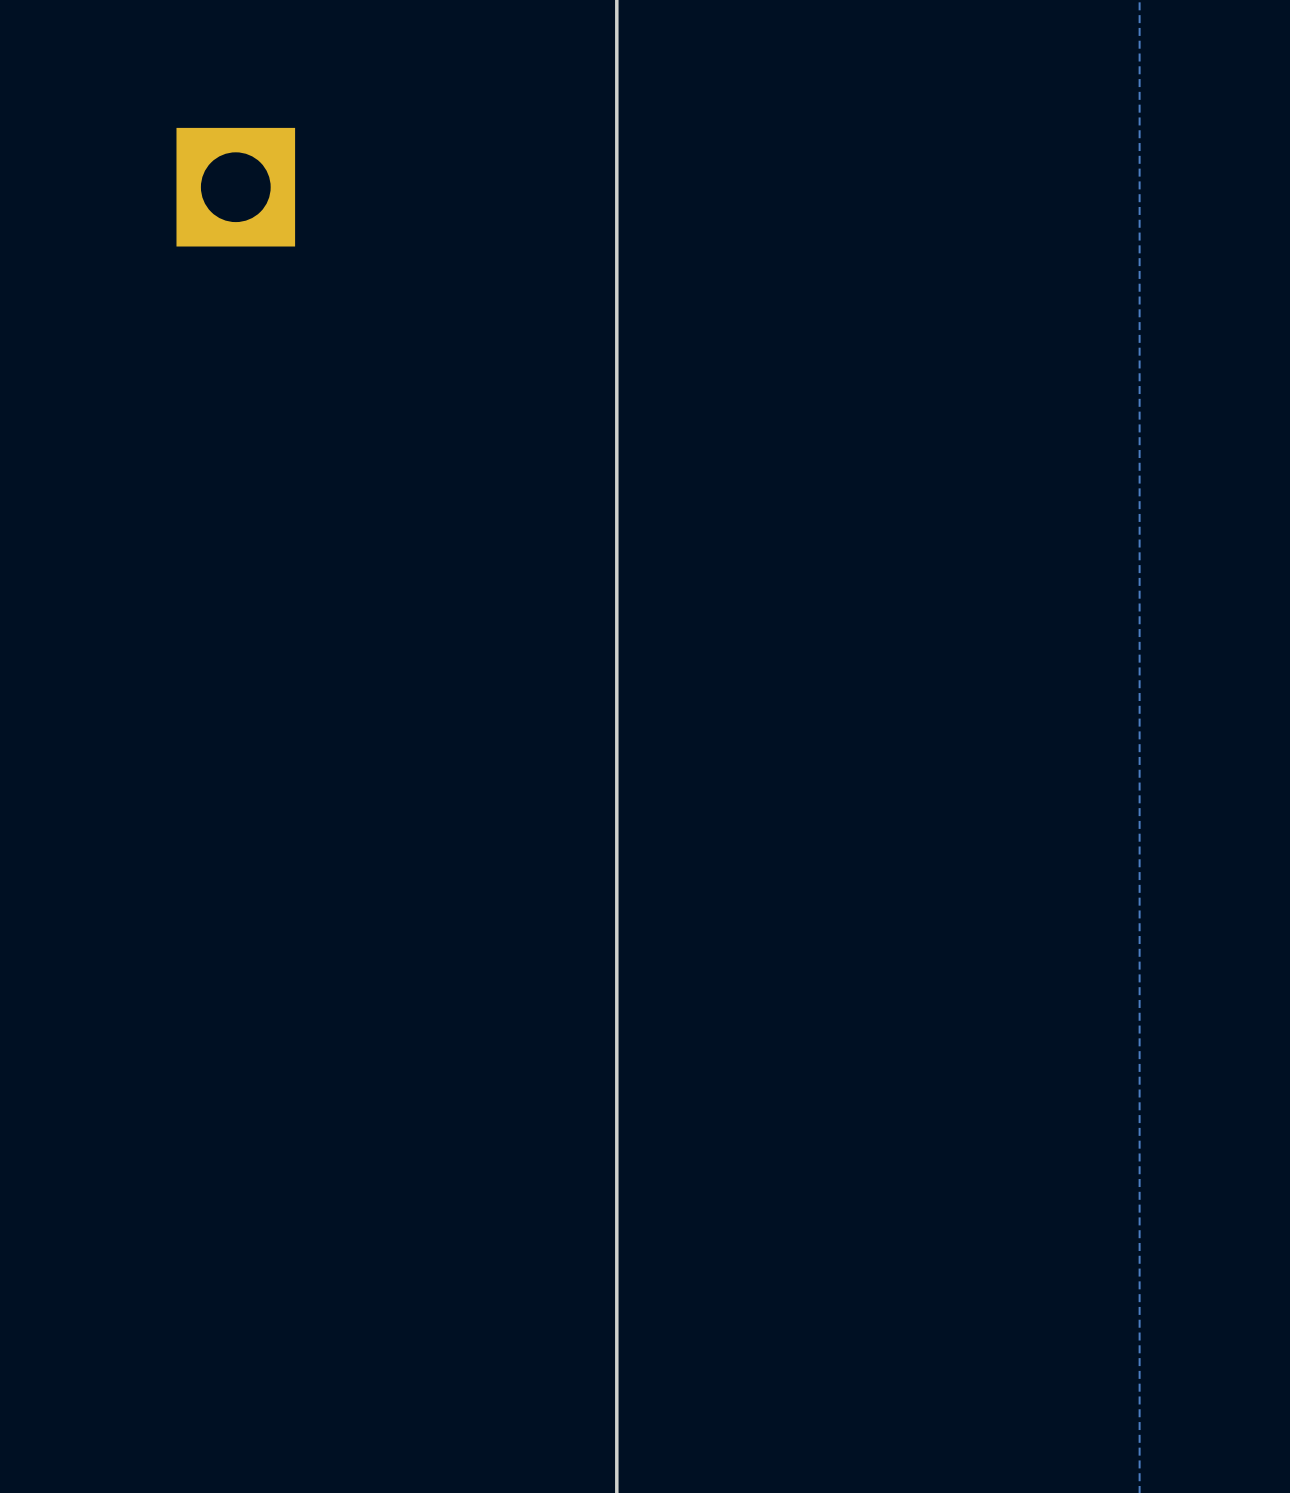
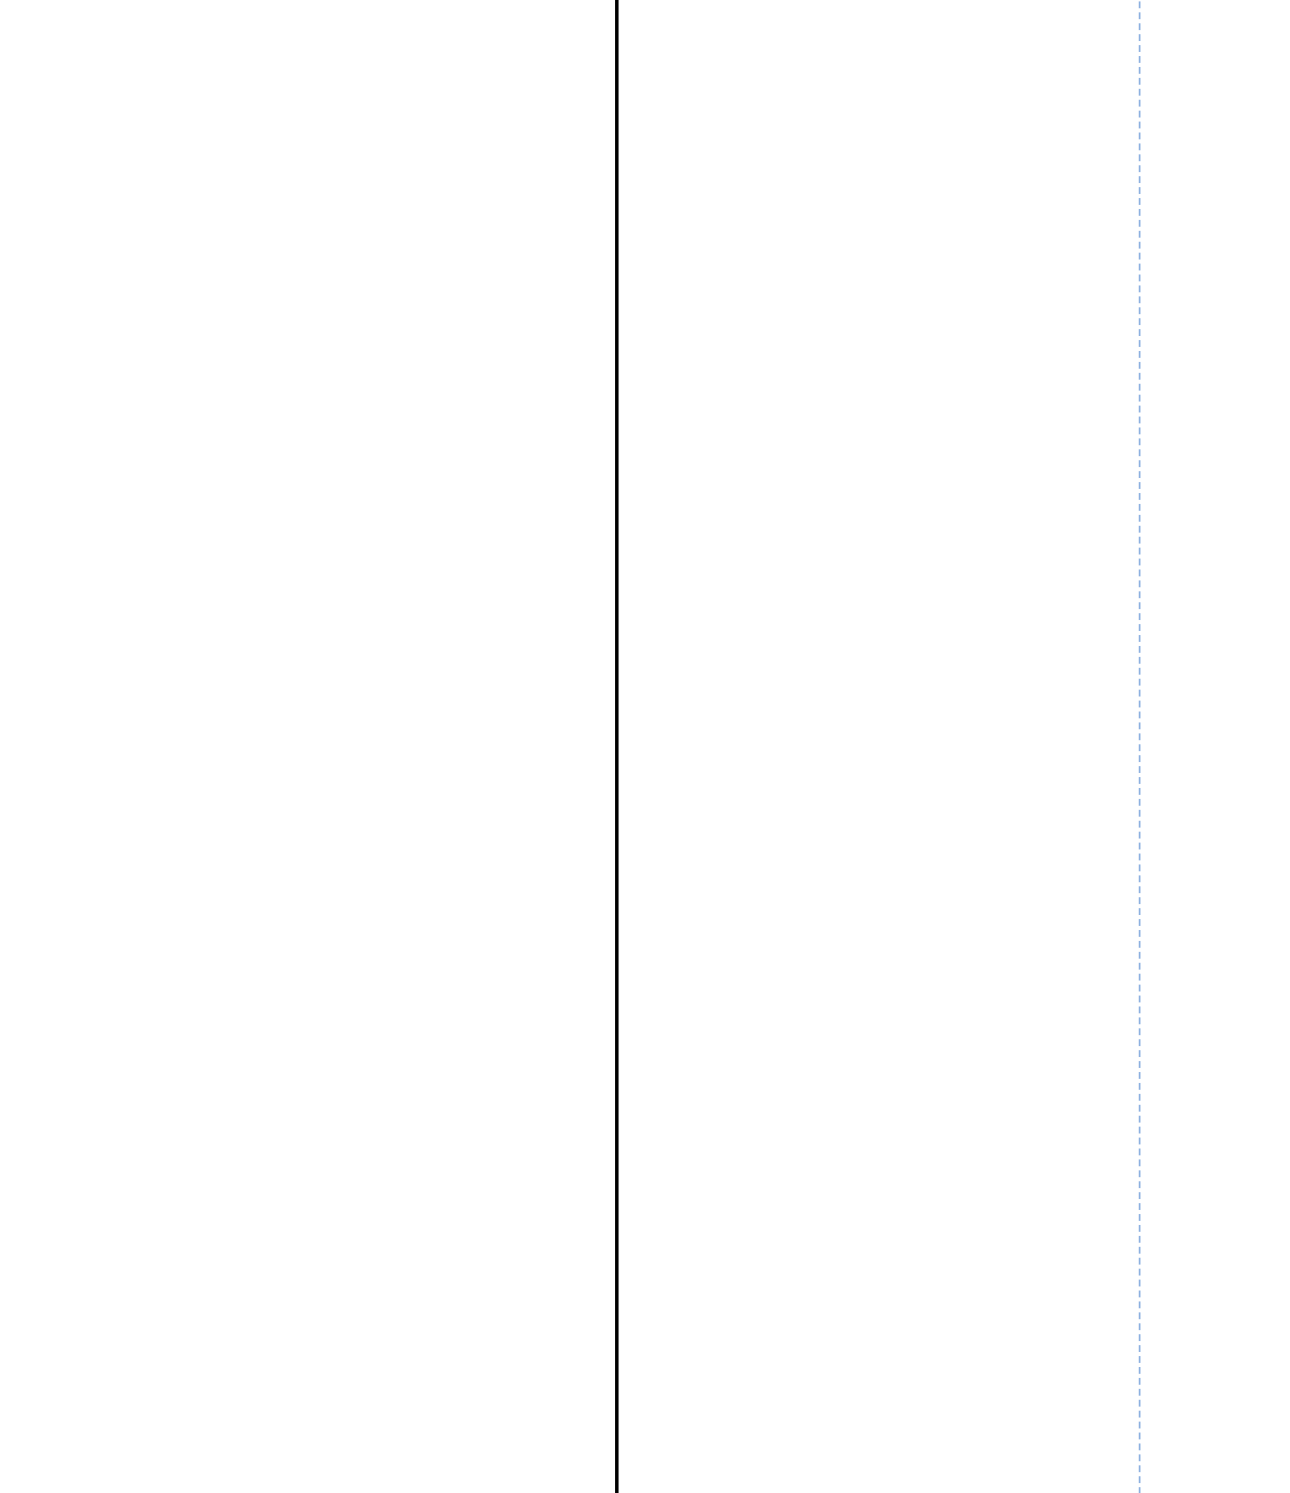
part: (235, 187) -> none

